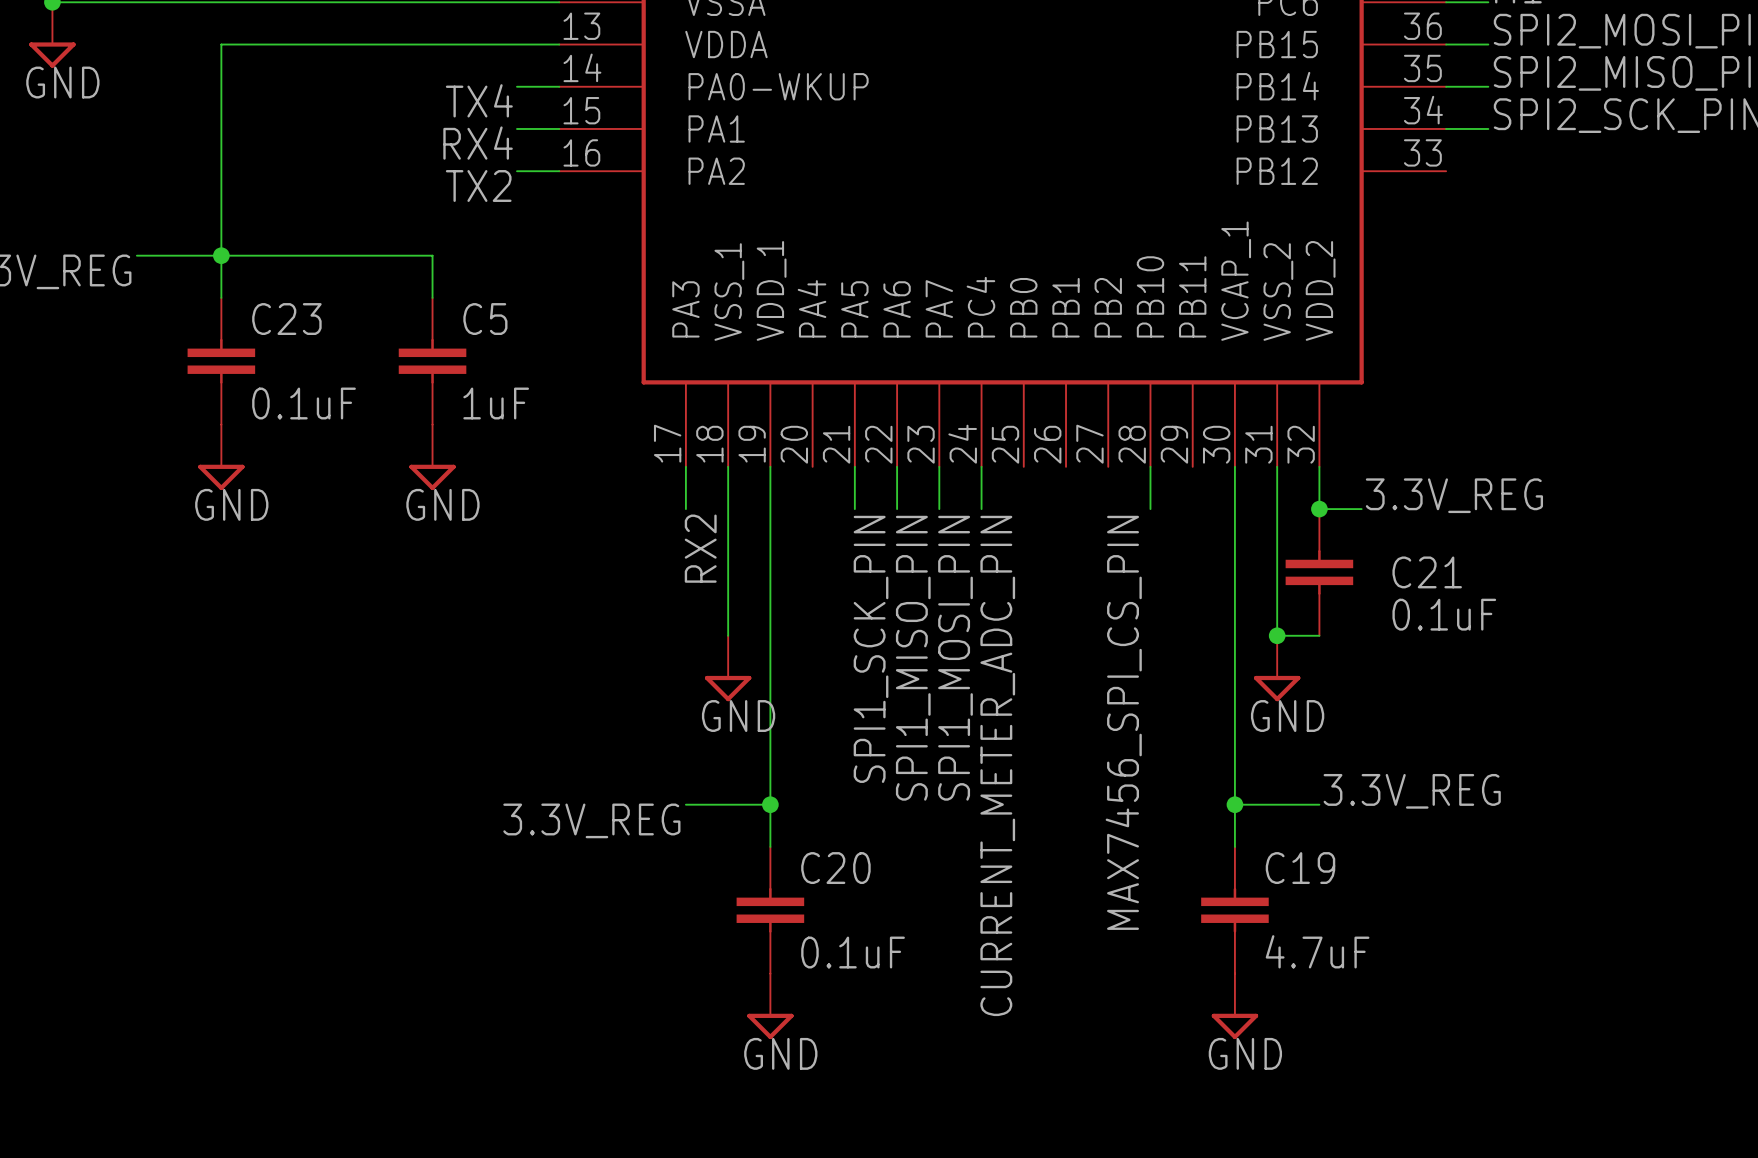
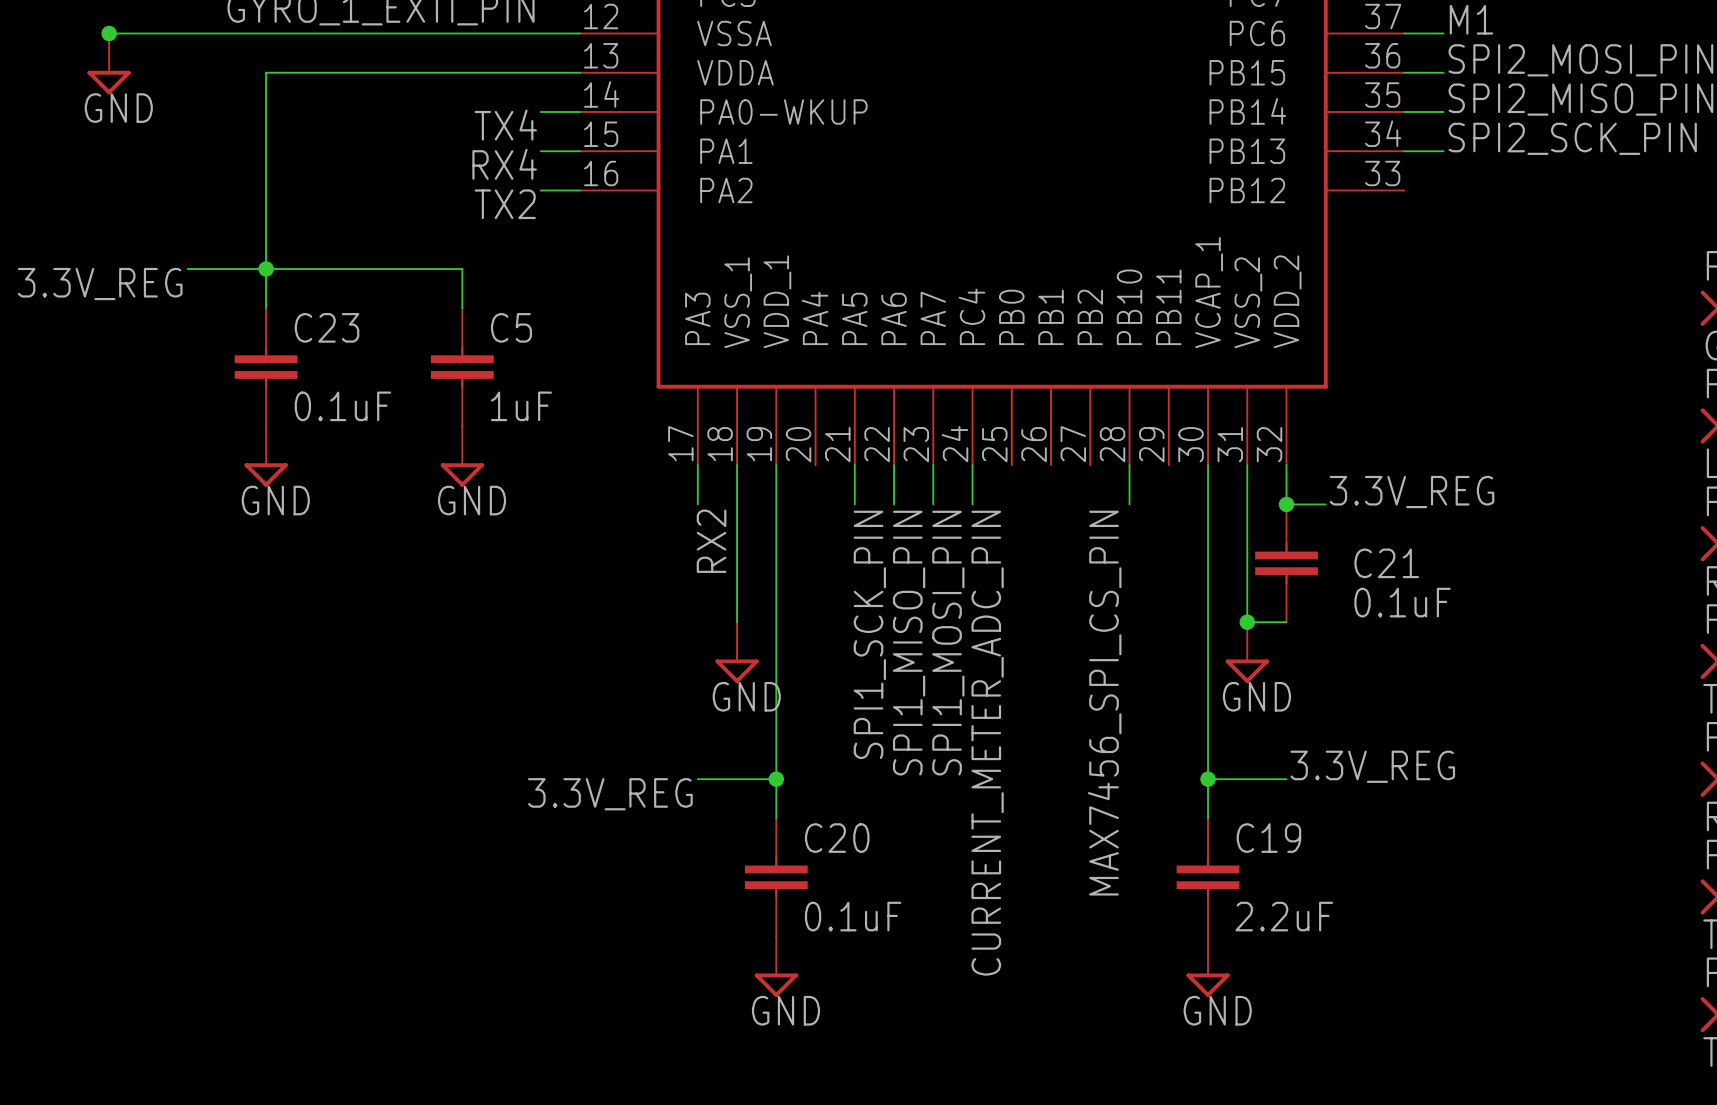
C19 value: 4.7uF (1317, 951) -> 2.2uF (1284, 916)

